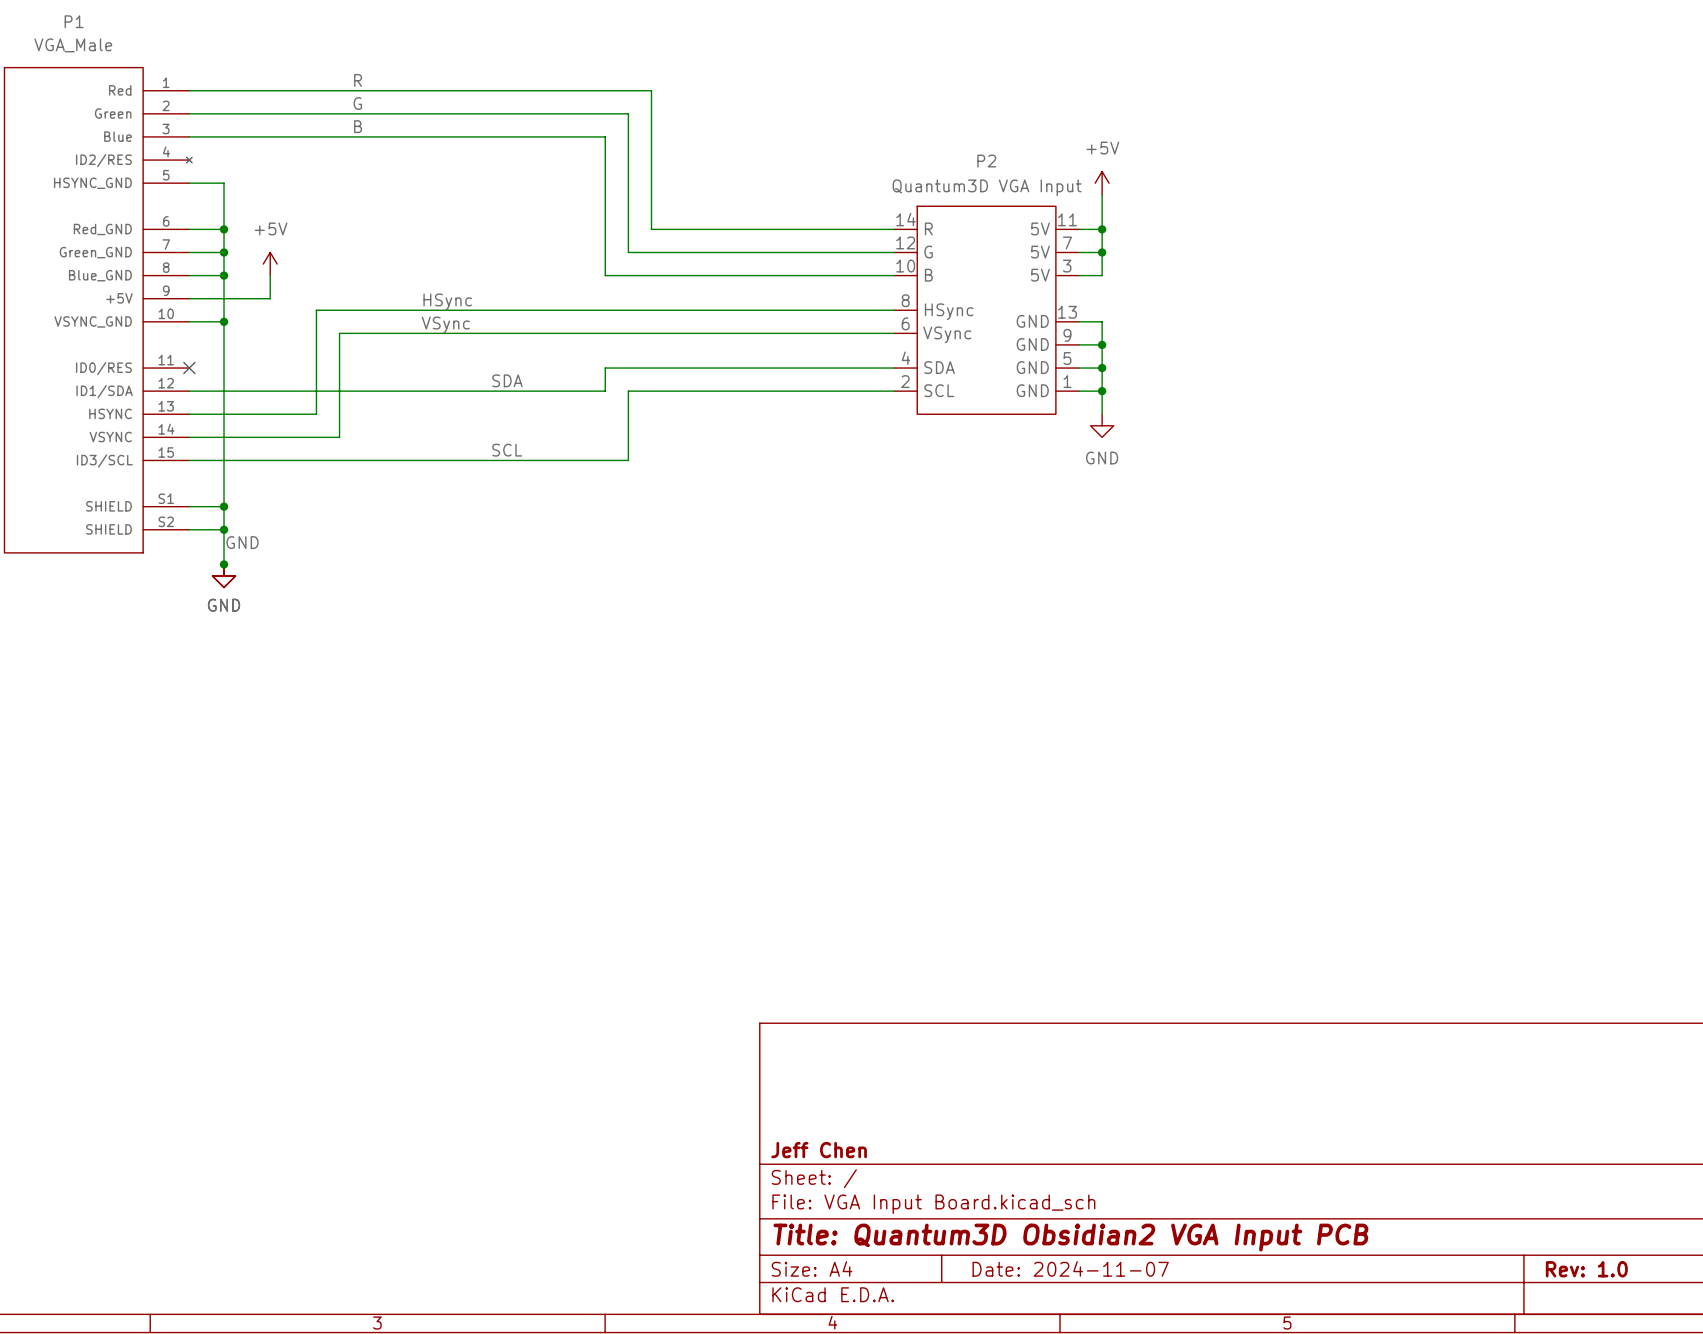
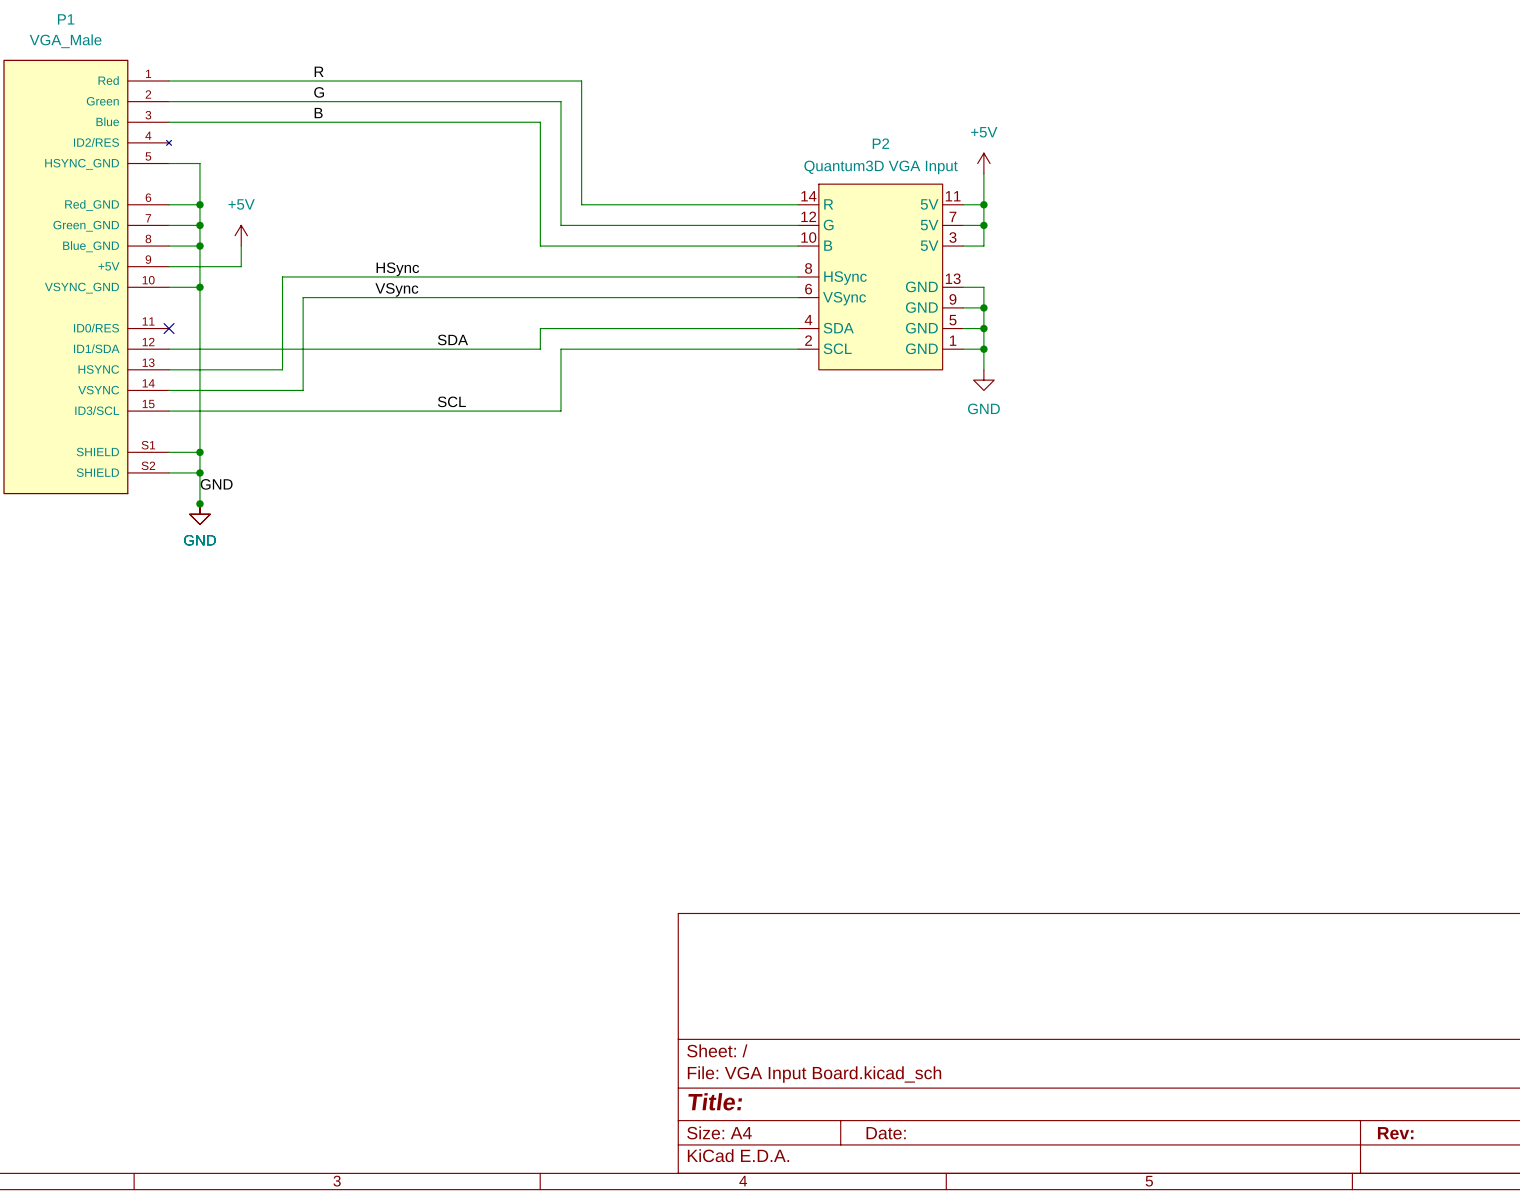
title block: Jeff Chen (819, 1150) -> none
title block: Title: Quantum3D Obsidian2 VGA Input PCB (1070, 1237) -> Title: (715, 1101)
title block: Date: 2024-11-07 (1070, 1268) -> Date: (886, 1133)
title block: Rev: 1.0 (1586, 1269) -> Rev: (1395, 1133)

